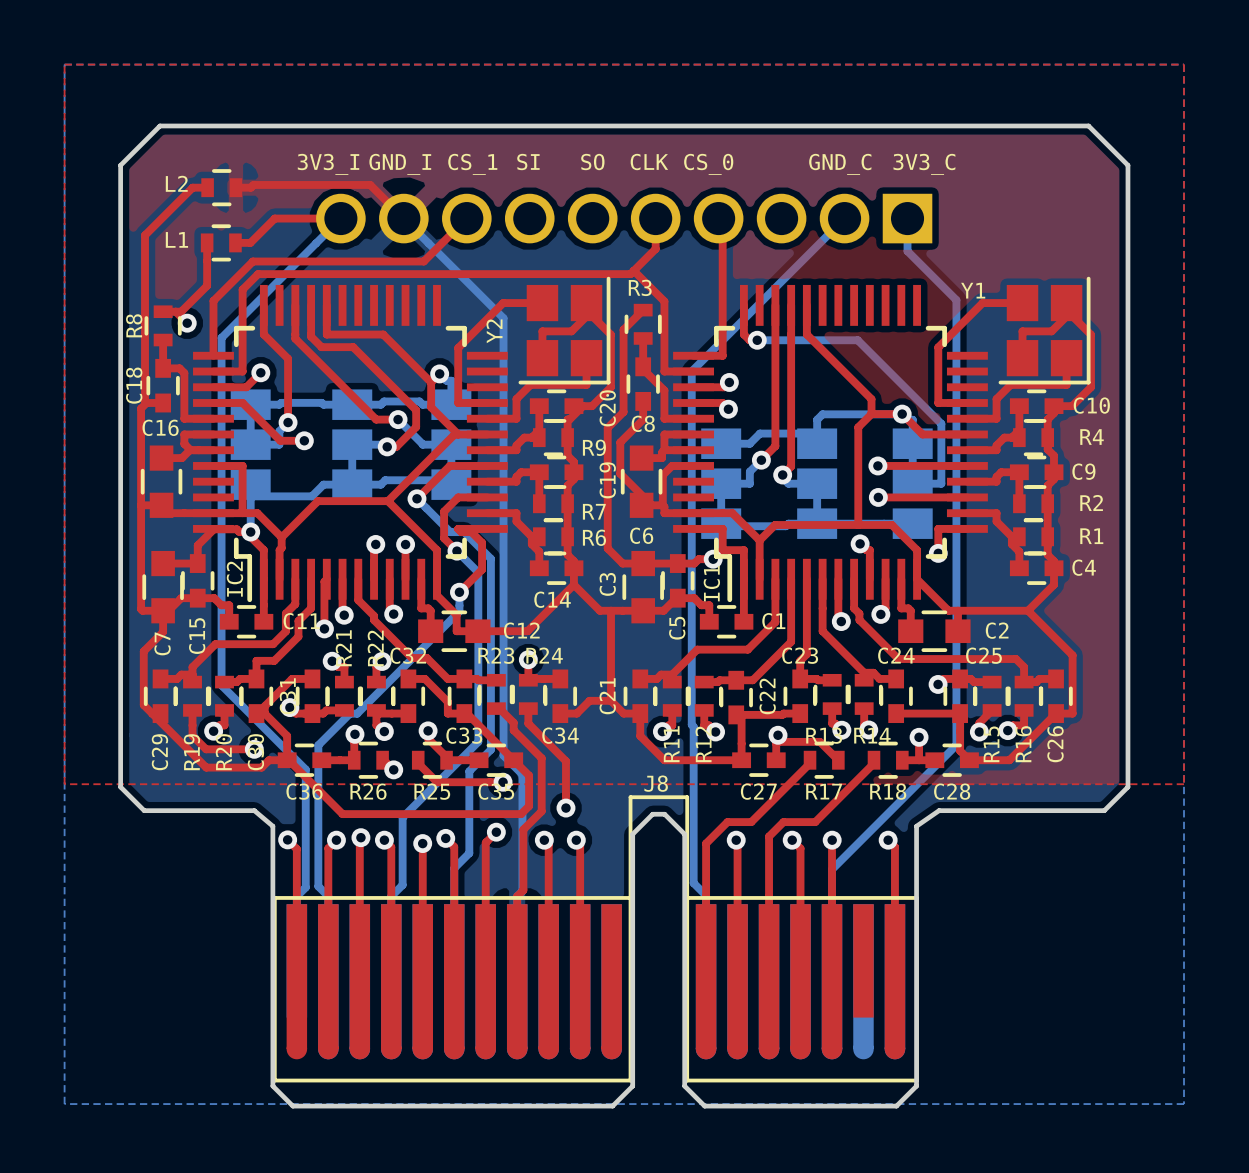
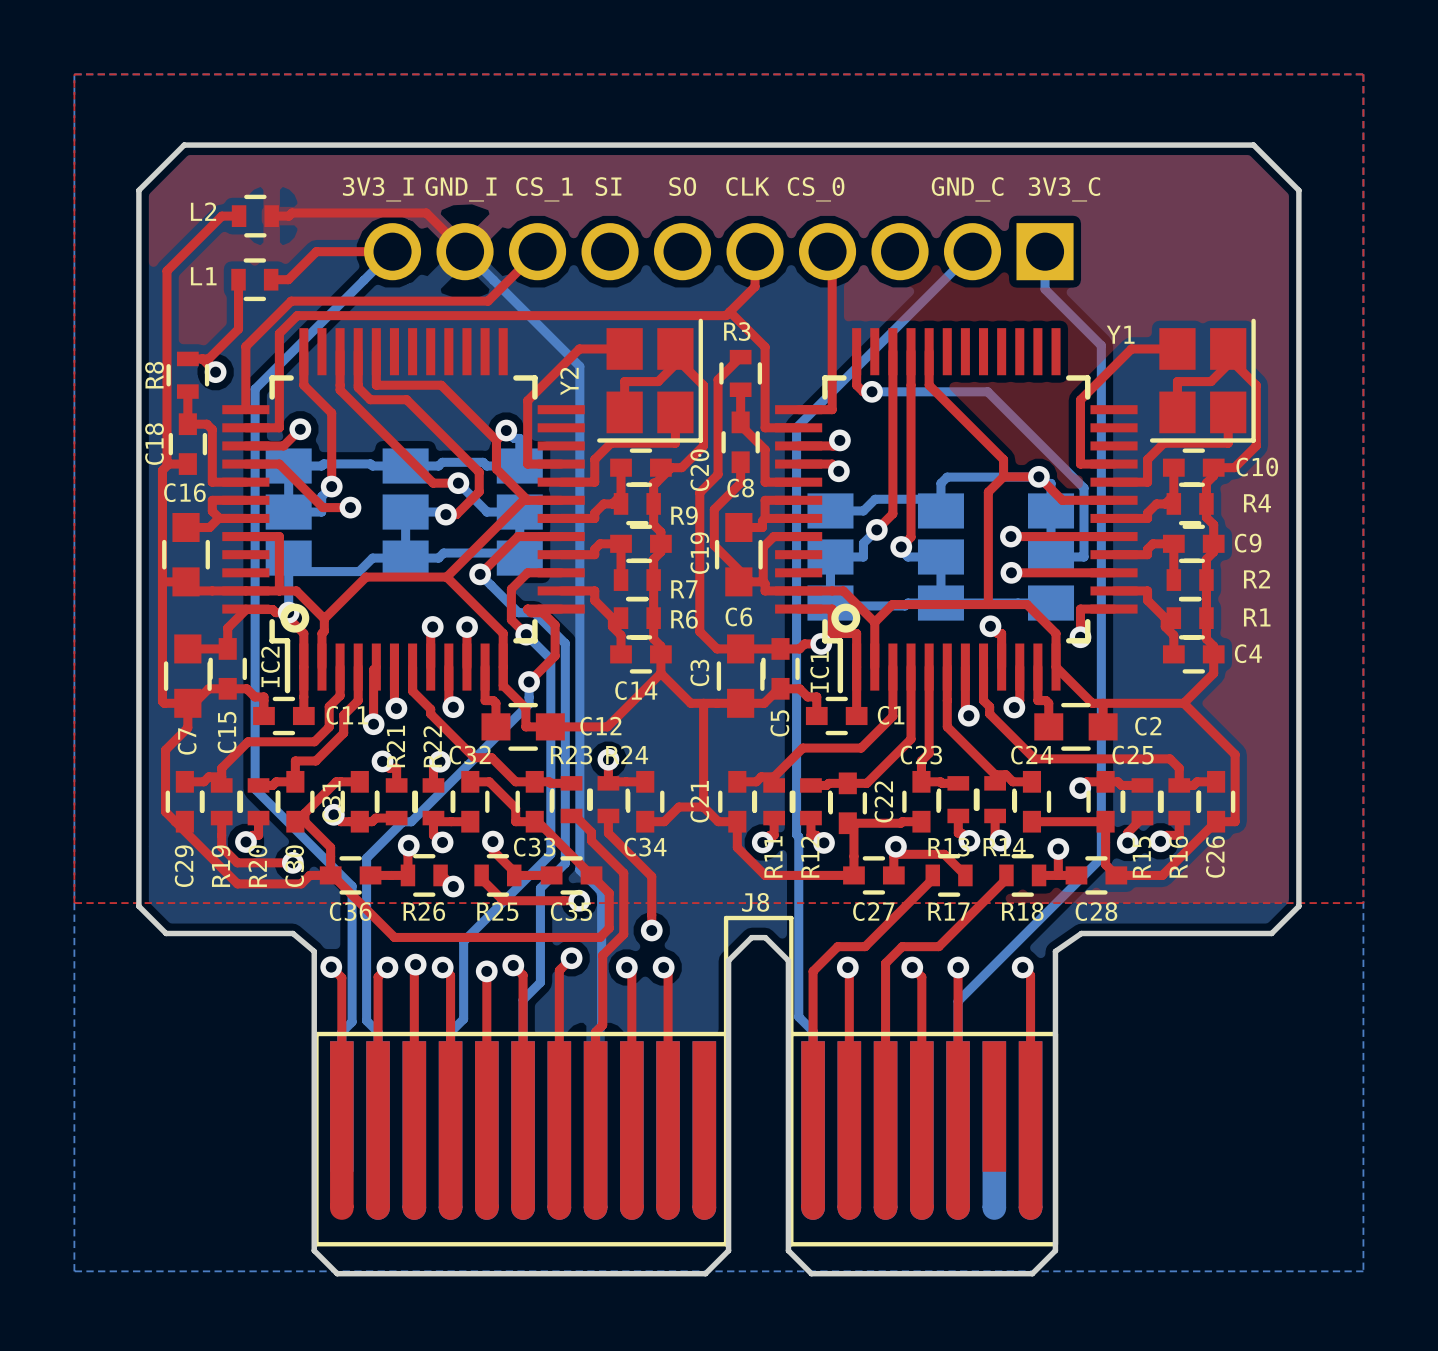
drawing: none -> [280, 603, 310, 633]
drawing: none -> [831, 603, 861, 633]

